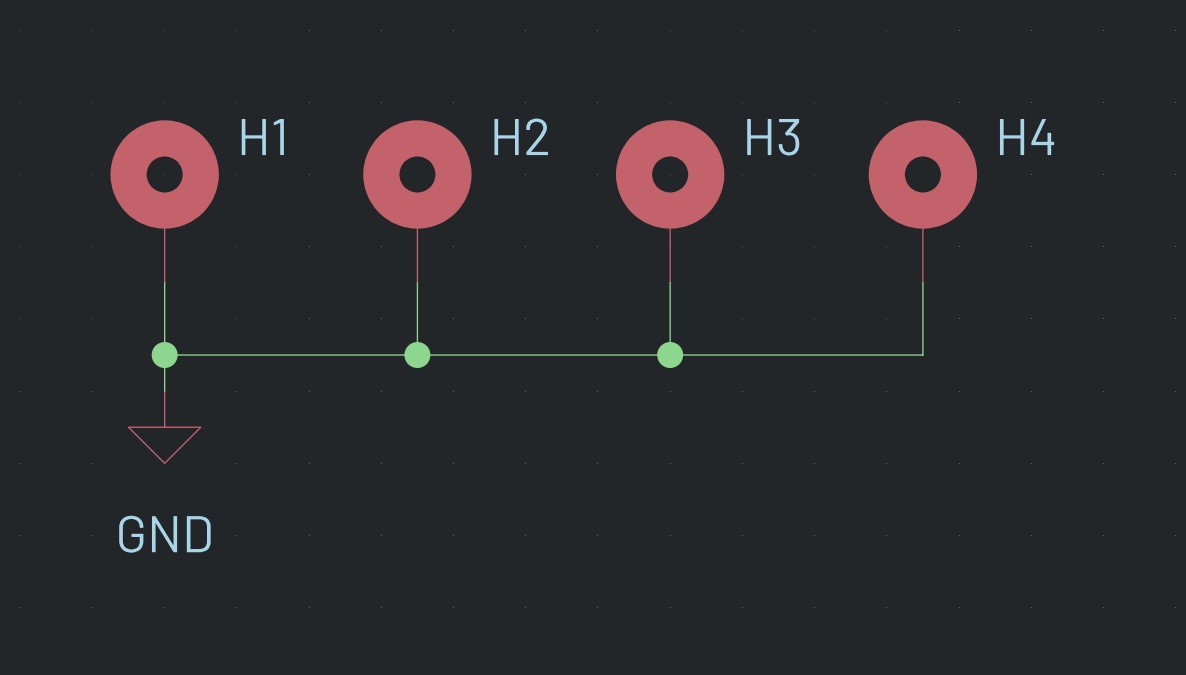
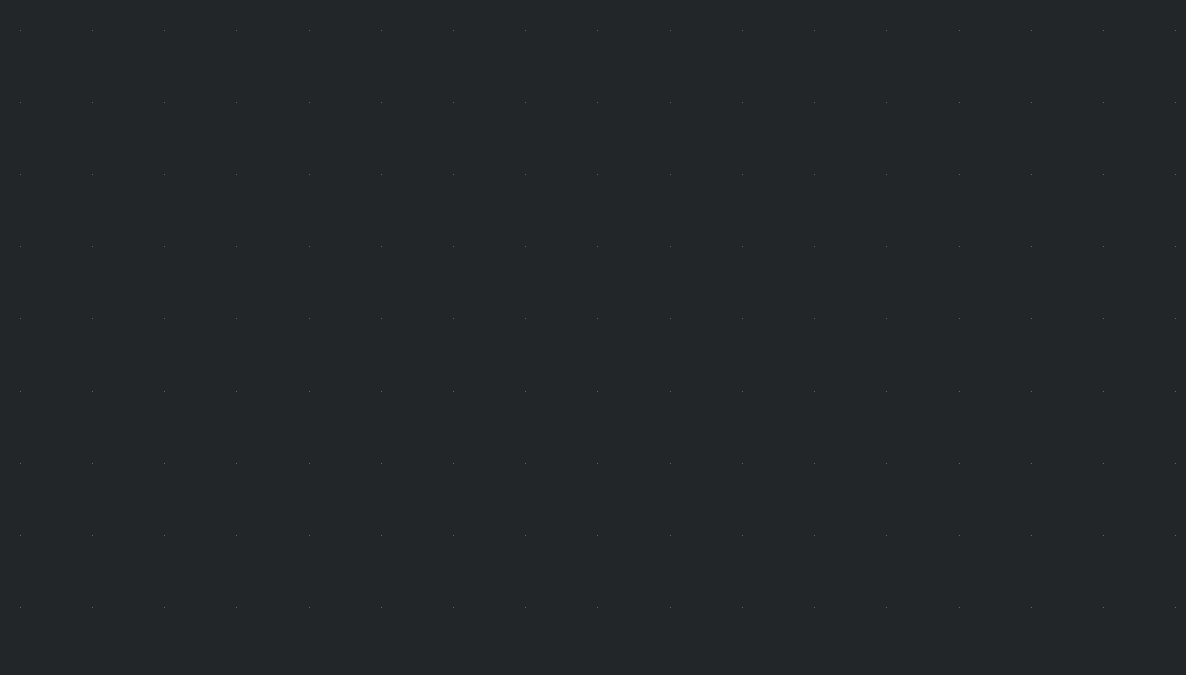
H1: (164, 201) -> none
H2: (417, 201) -> none
H3: (670, 201) -> none
H4: (922, 201) -> none
wire: (164, 282) (164, 391) -> none
wire: (417, 282) (417, 355) -> none
wire: (670, 282) (670, 355) -> none
wire: (922, 282) (922, 355) (164, 355) -> none
junction: (164, 355) -> none
junction: (417, 355) -> none
junction: (670, 355) -> none
power symbol: GND (164, 427) -> none

